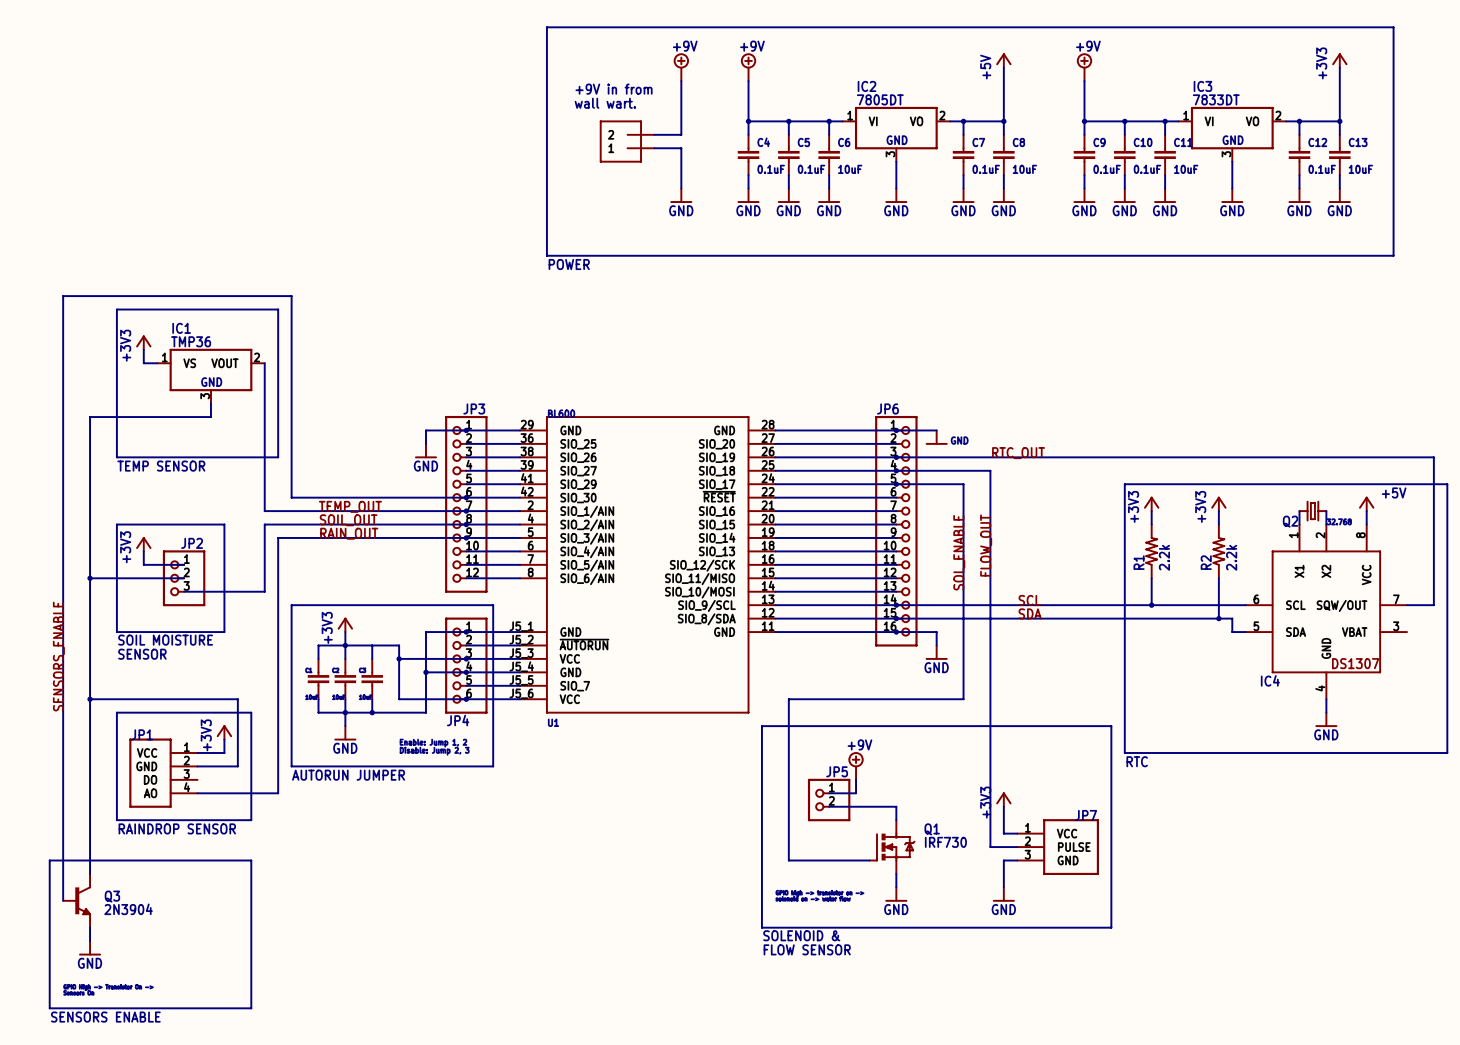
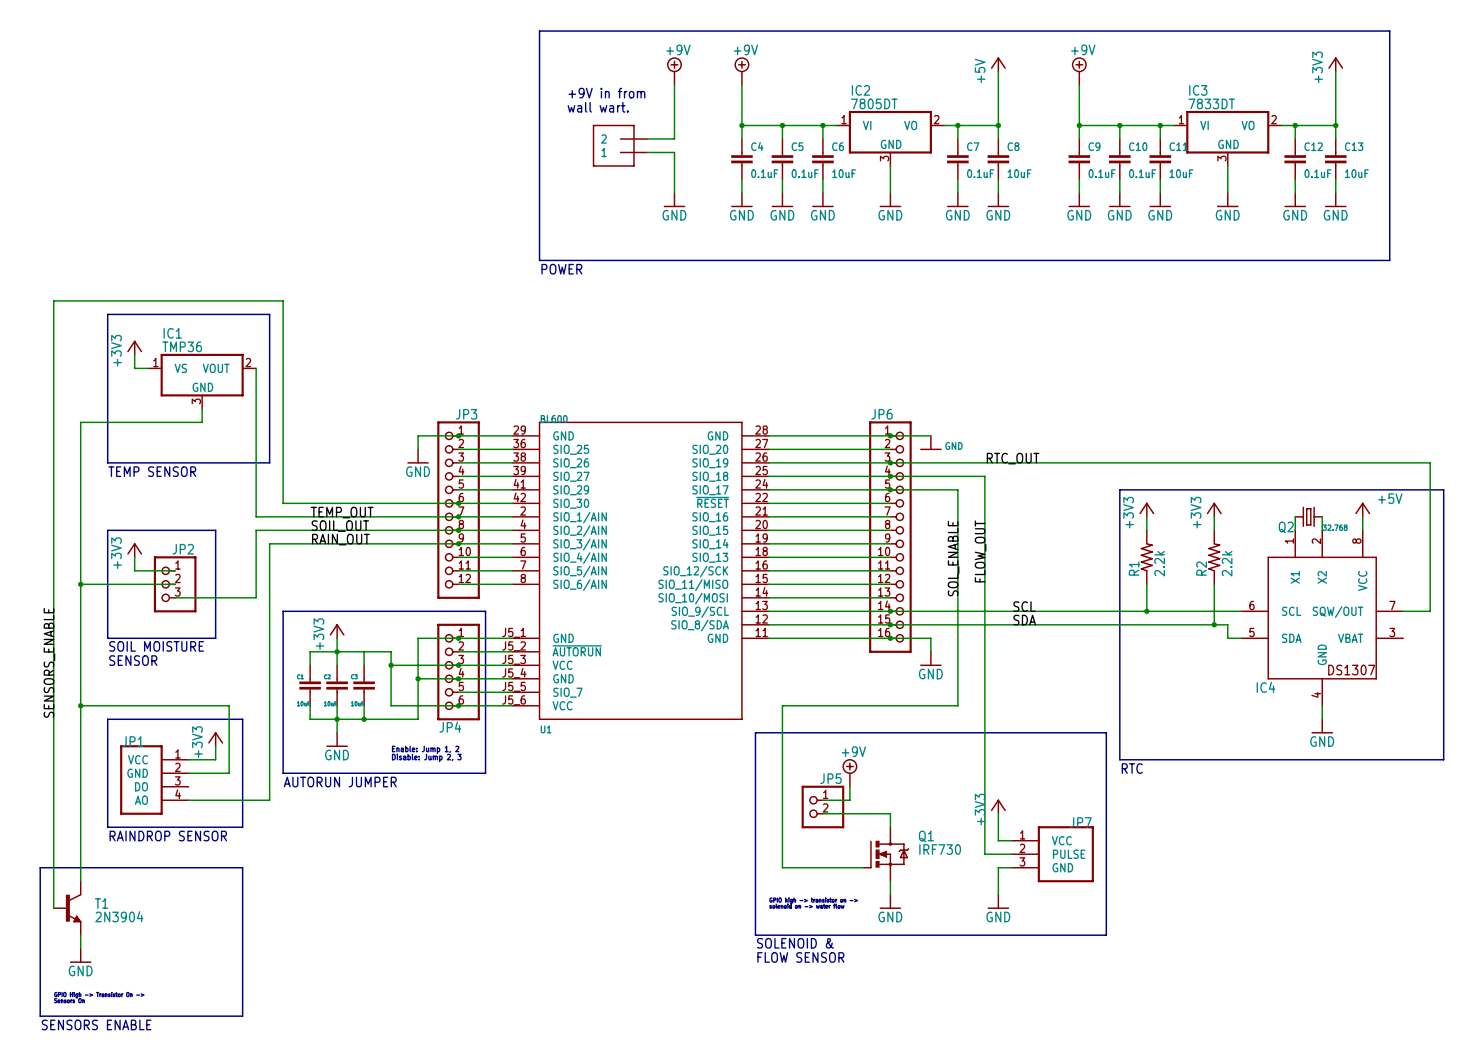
Q3 name: Q3 (112, 896) -> T1 (101, 903)

